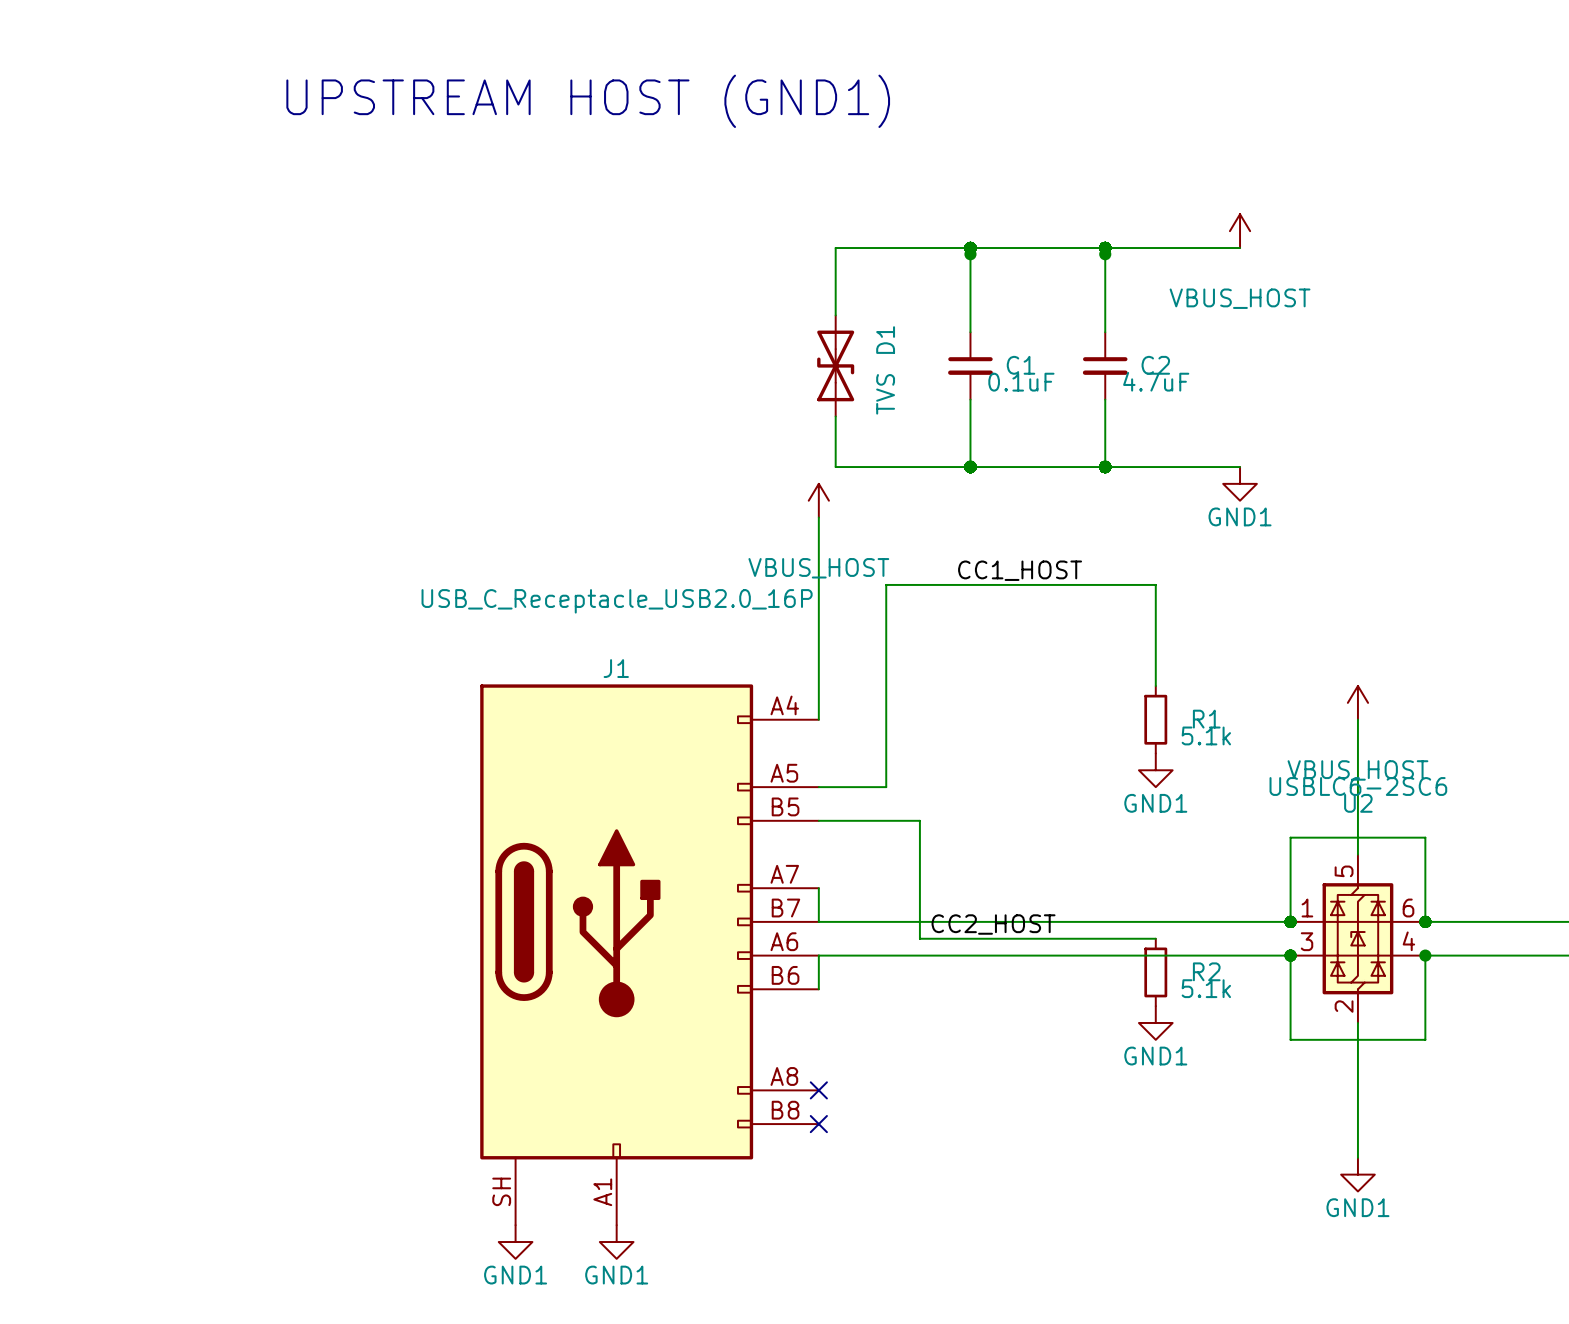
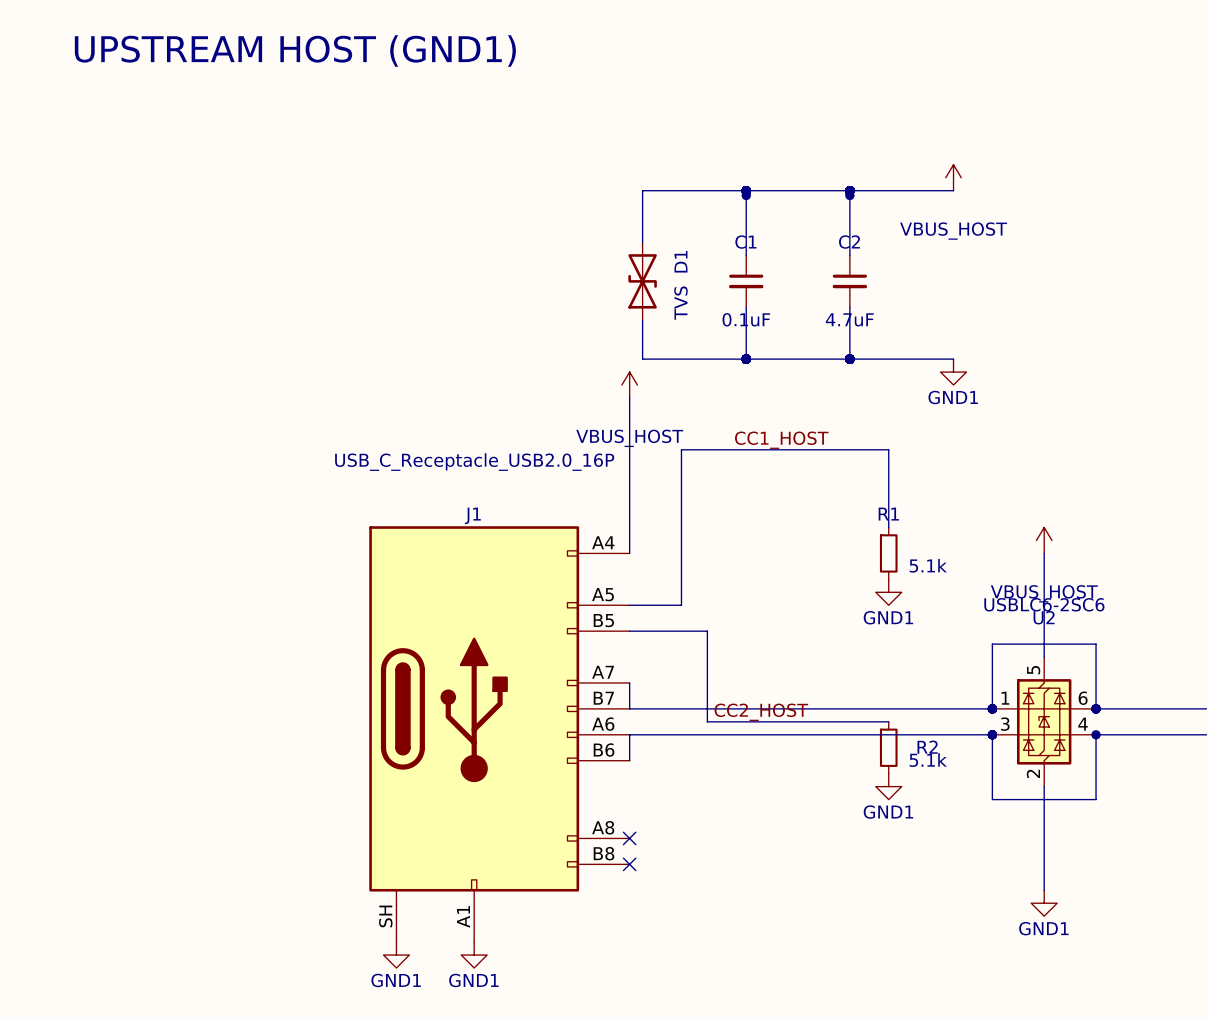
text position: UPSTREAM HOST (GND1) (588, 101) -> UPSTREAM HOST (GND1) (295, 50)
C1 name position: C1 (1021, 365) -> C1 (745, 242)
C2 name position: C2 (1155, 365) -> C2 (849, 242)
C2 value position: 4.7uF (1156, 381) -> 4.7uF (849, 319)
C1 value position: 0.1uF (1021, 382) -> 0.1uF (746, 319)
R1 name position: R1 (1206, 719) -> R1 (888, 514)

